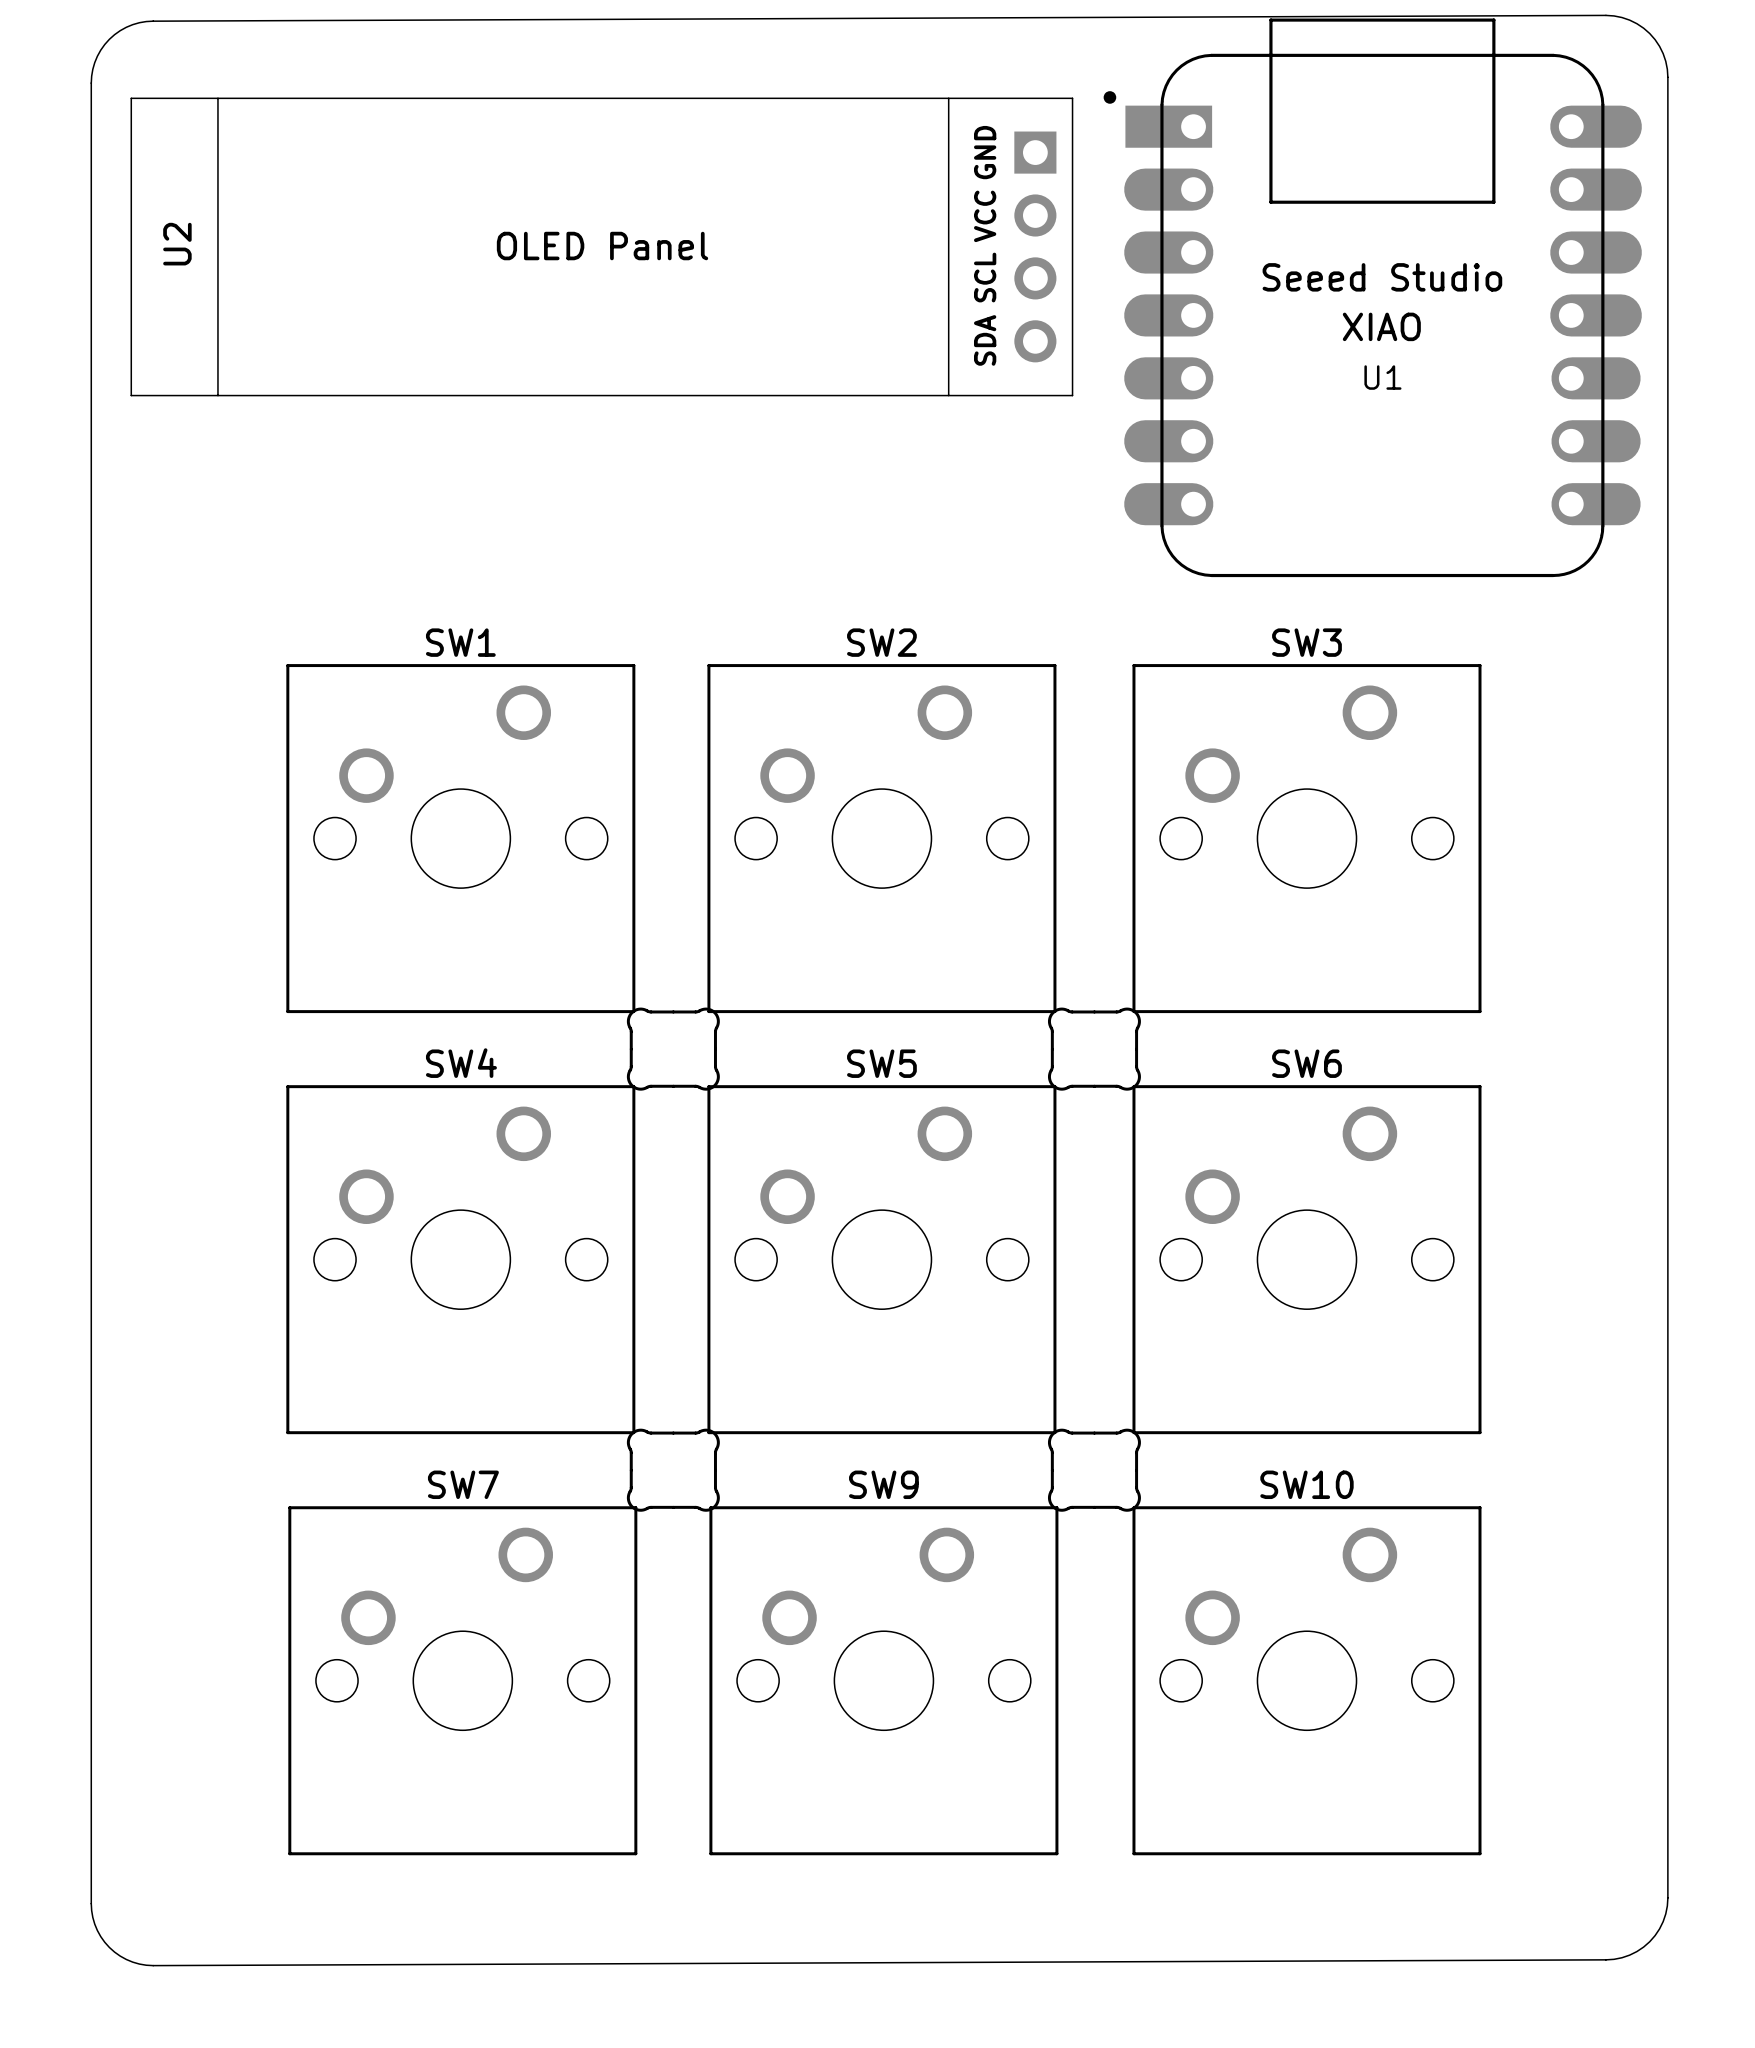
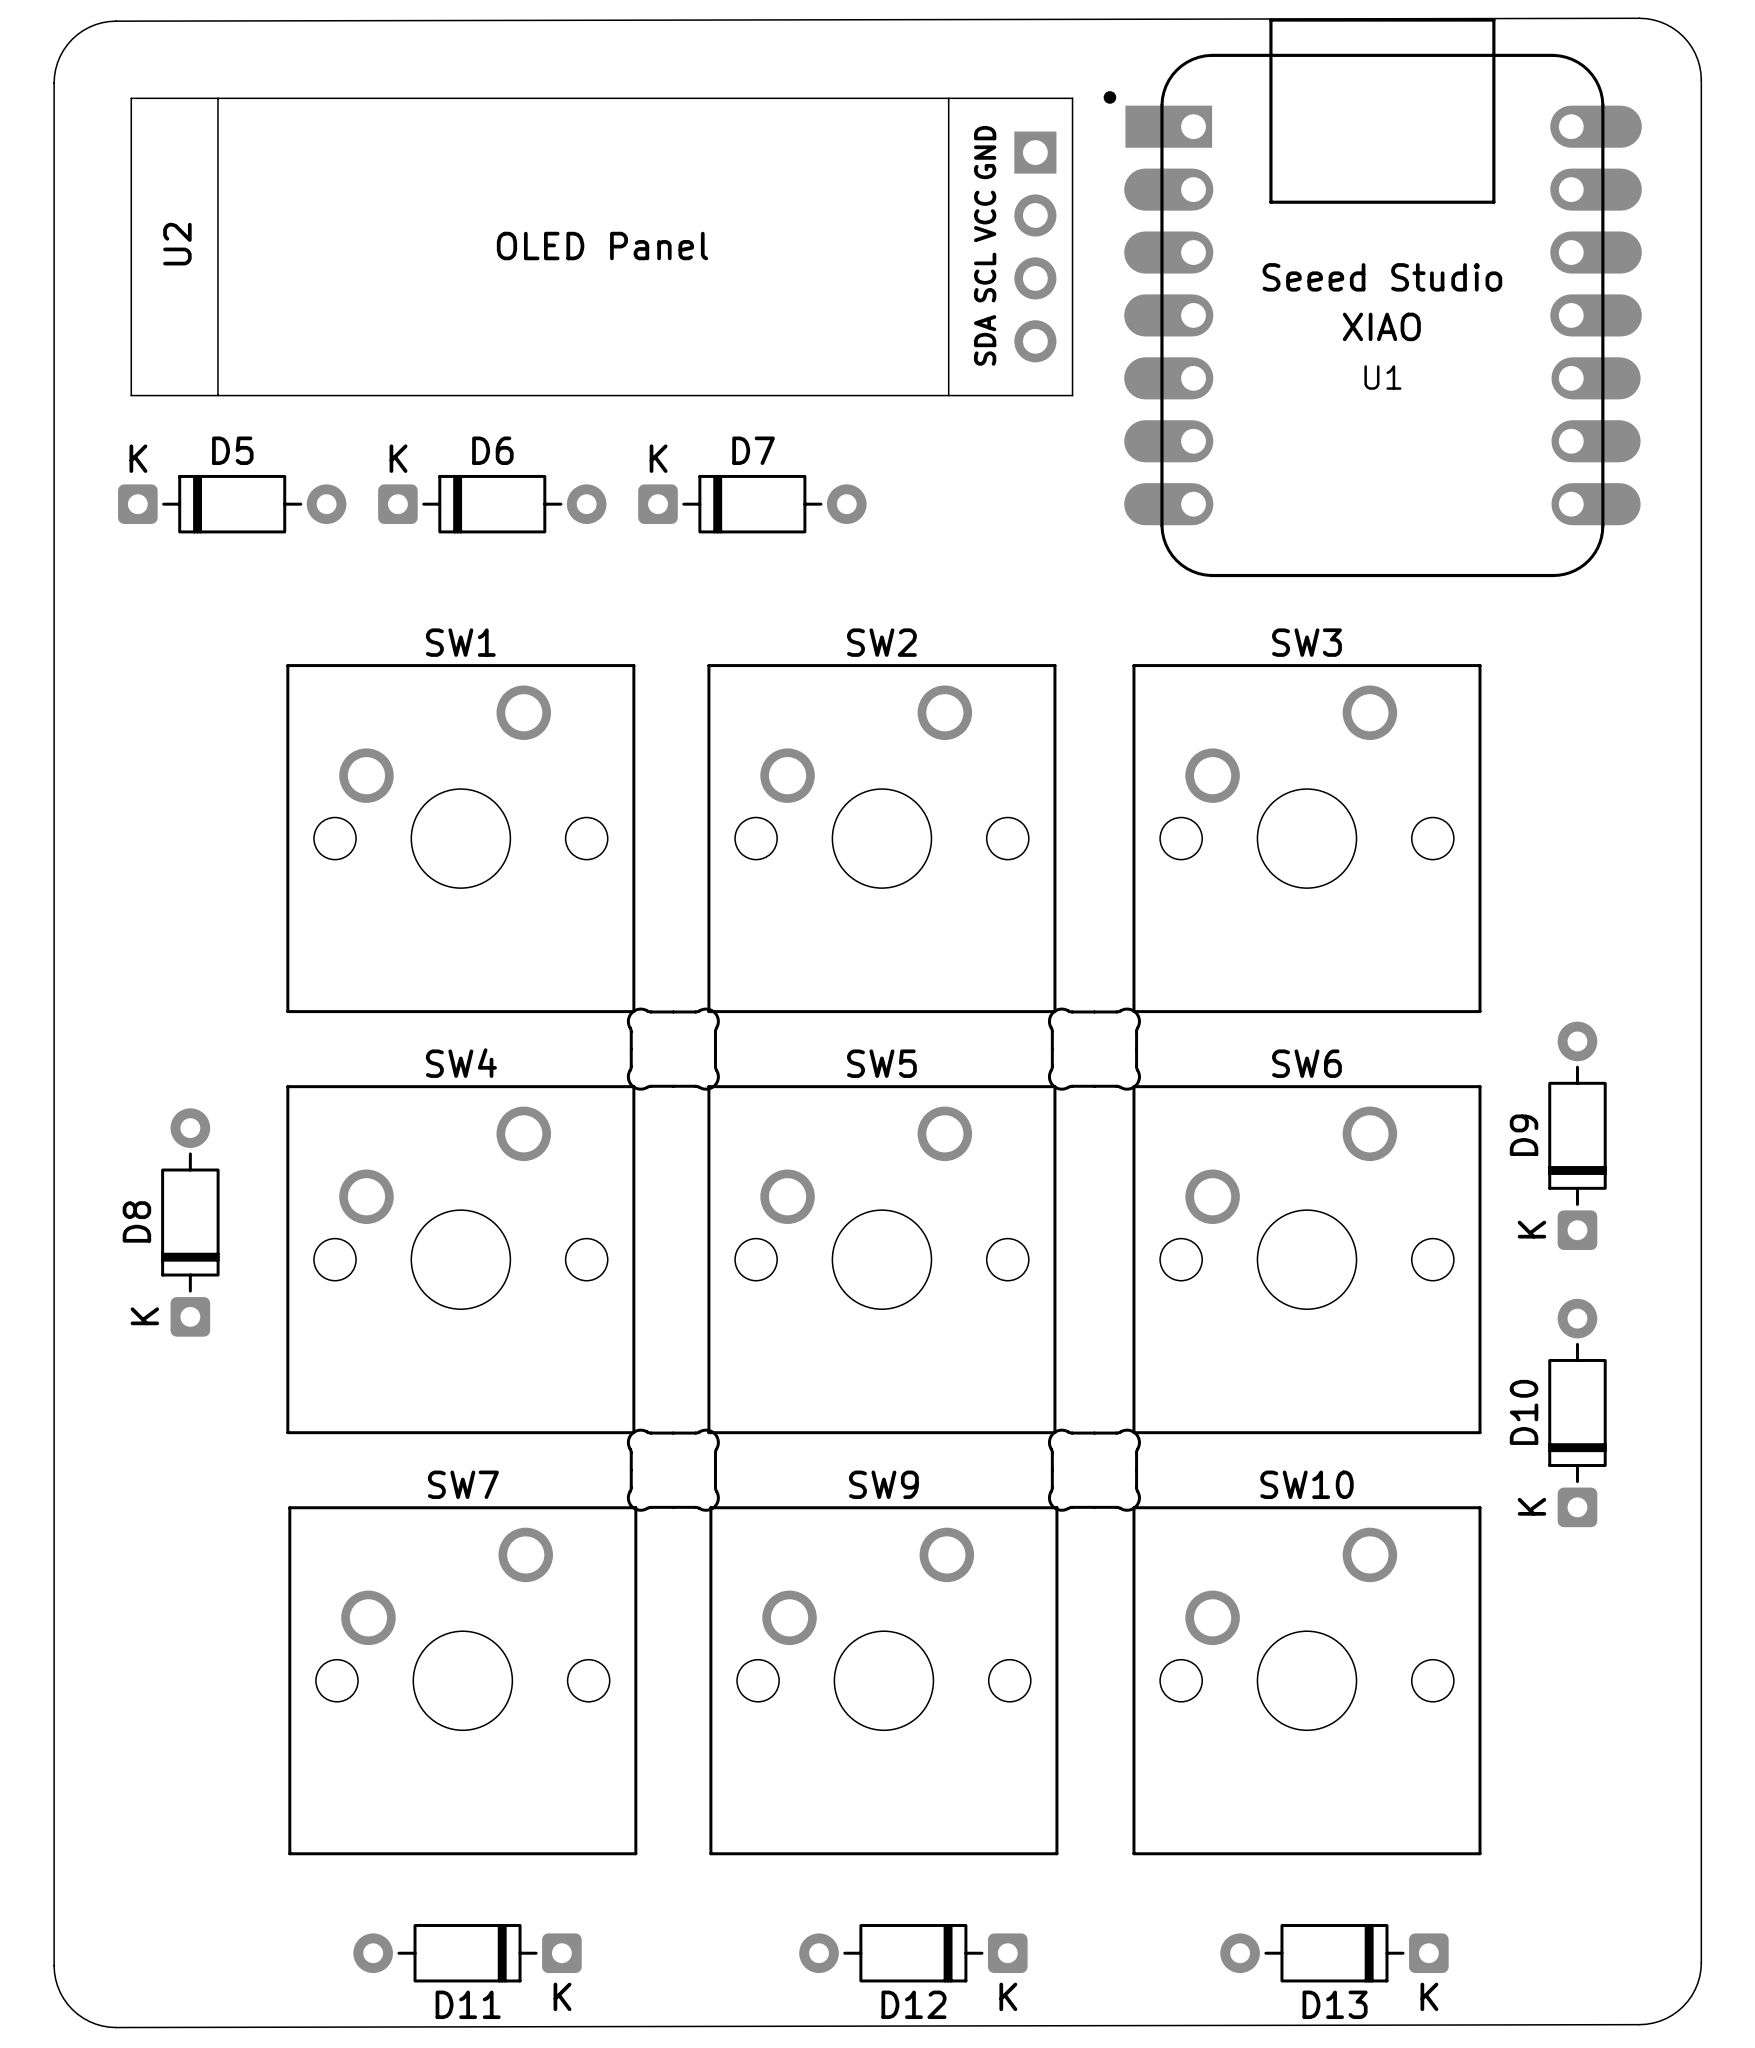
board edge: (1605, 15) (153, 21) (139, 22) (126, 27) (114, 34) (104, 44) (94, 62) (91, 83) (91, 1903) (92, 1917) (97, 1930) (104, 1942) (114, 1952) (132, 1962) (153, 1965) (1605, 1959) (1629, 1955) (1643, 1947) (1655, 1935) (1663, 1921) (1667, 1897) (1667, 77) (1663, 53) (1649, 33) (1629, 20) (1605, 15) -> (1639, 2024) (116, 2027) (102, 2025) (89, 2021) (77, 2014) (67, 2004) (57, 1986) (54, 1965) (54, 83) (55, 69) (60, 56) (67, 44) (77, 34) (95, 24) (116, 21) (1639, 18) (1653, 19) (1666, 24) (1678, 31) (1687, 41) (1697, 59) (1701, 80) (1701, 1962) (1699, 1976) (1695, 1989) (1683, 2006) (1666, 2018) (1653, 2023) (1639, 2024)
D5: none -> (232, 504)
D6: none -> (492, 504)
D7: none -> (752, 504)
D9: none -> (1577, 1135)
D8: none -> (190, 1222)
D10: none -> (1577, 1412)
D11: none -> (467, 1953)
D12: none -> (913, 1953)
D13: none -> (1334, 1953)

